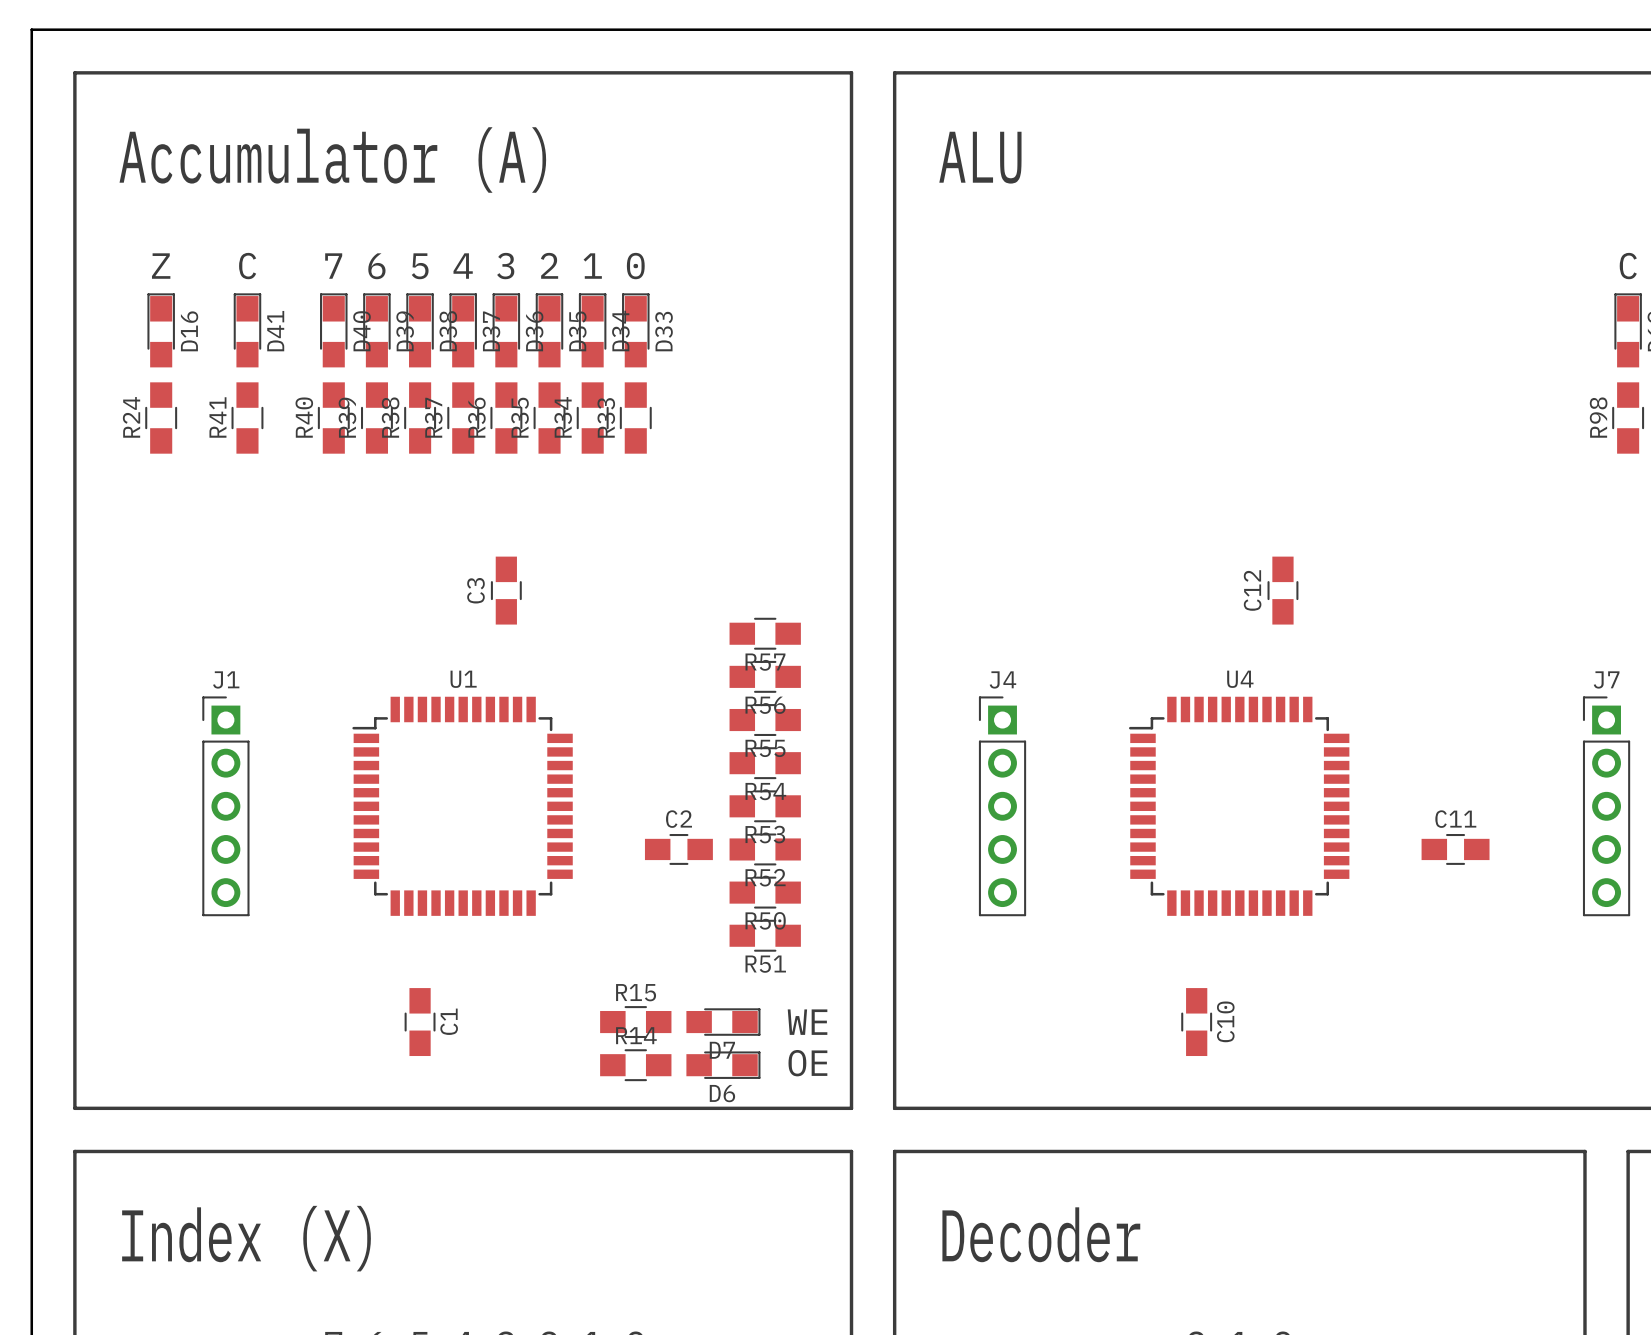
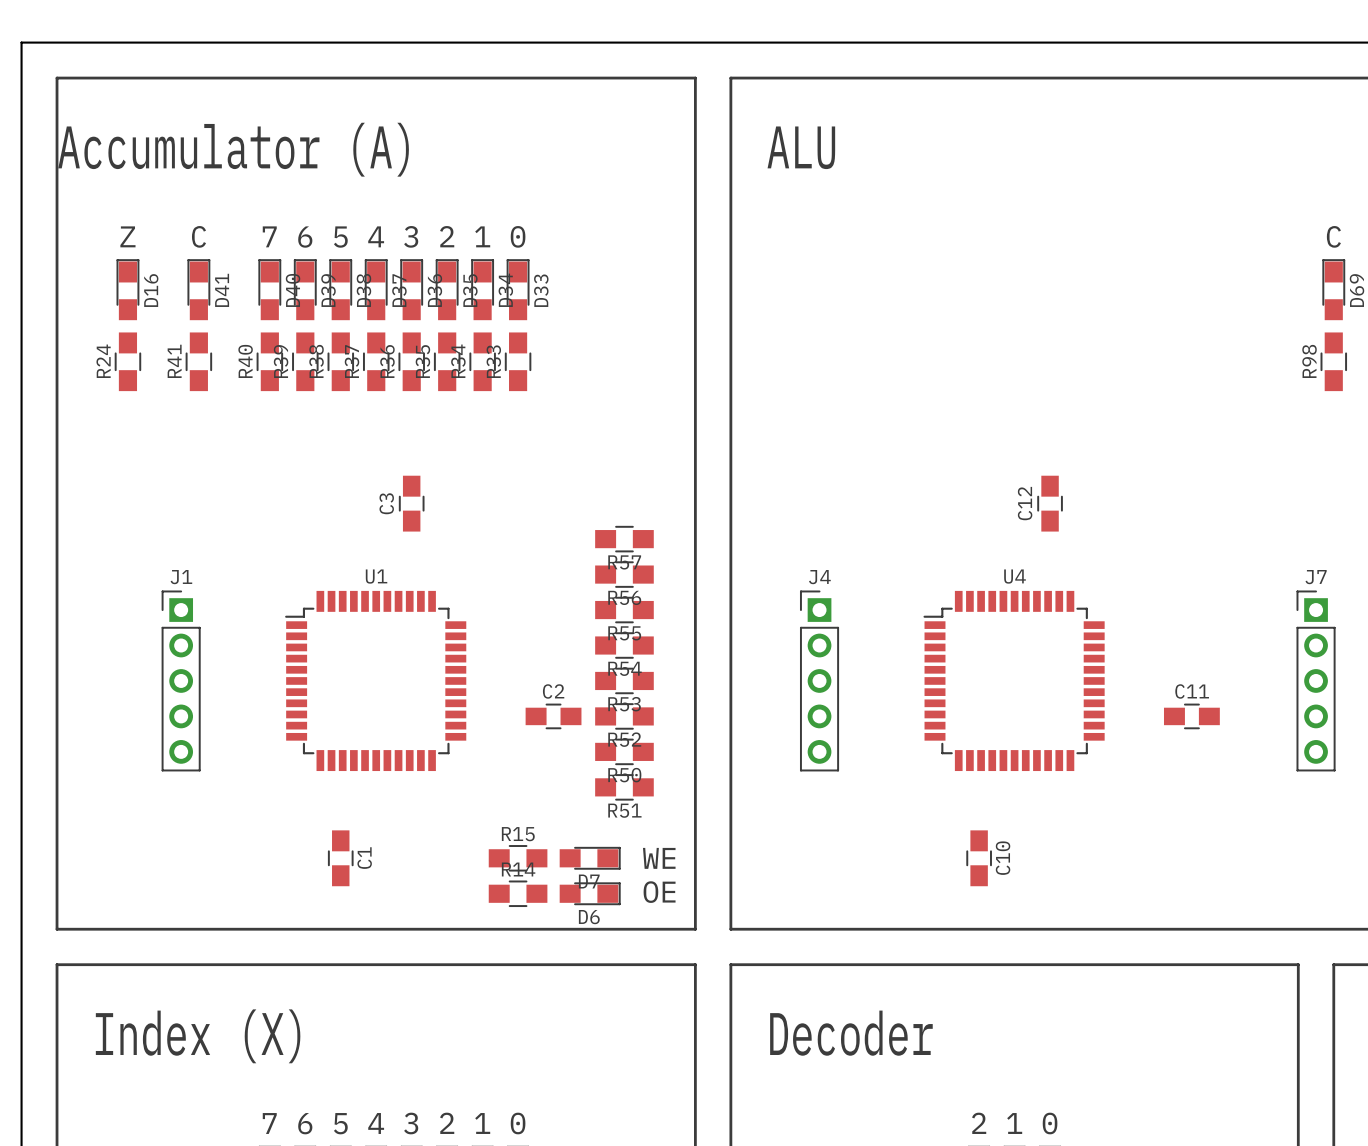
text position: Accumulator (A) (332, 160) -> Accumulator (A) (233, 149)

